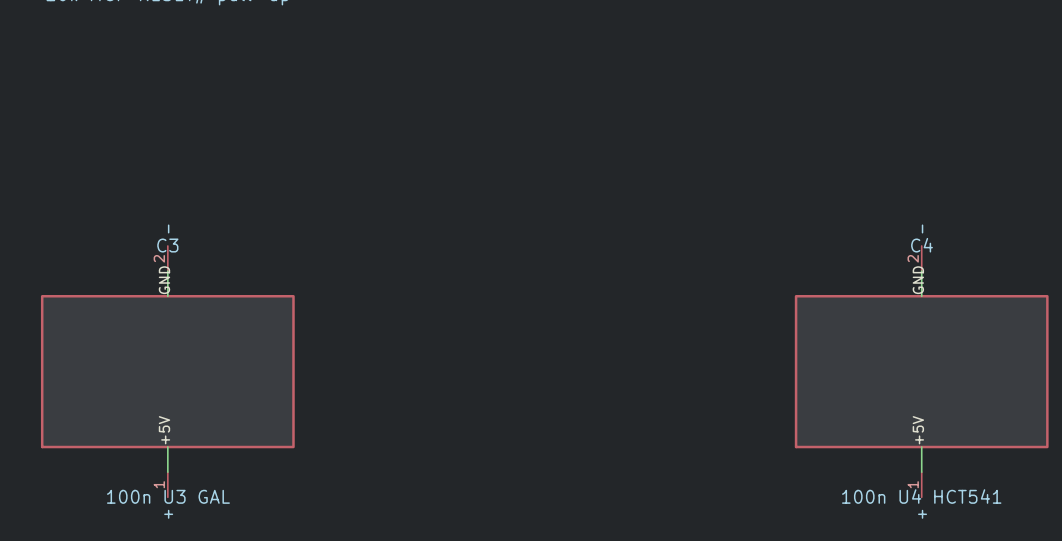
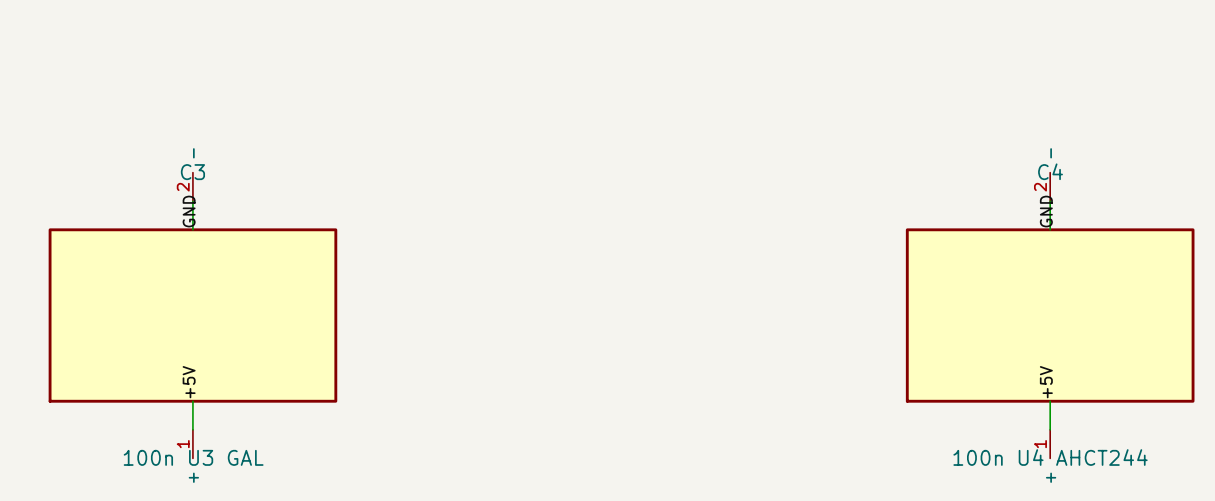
C4 value: 100n U4 HCT541 (921, 496) -> 100n U4 AHCT244 (1050, 457)

